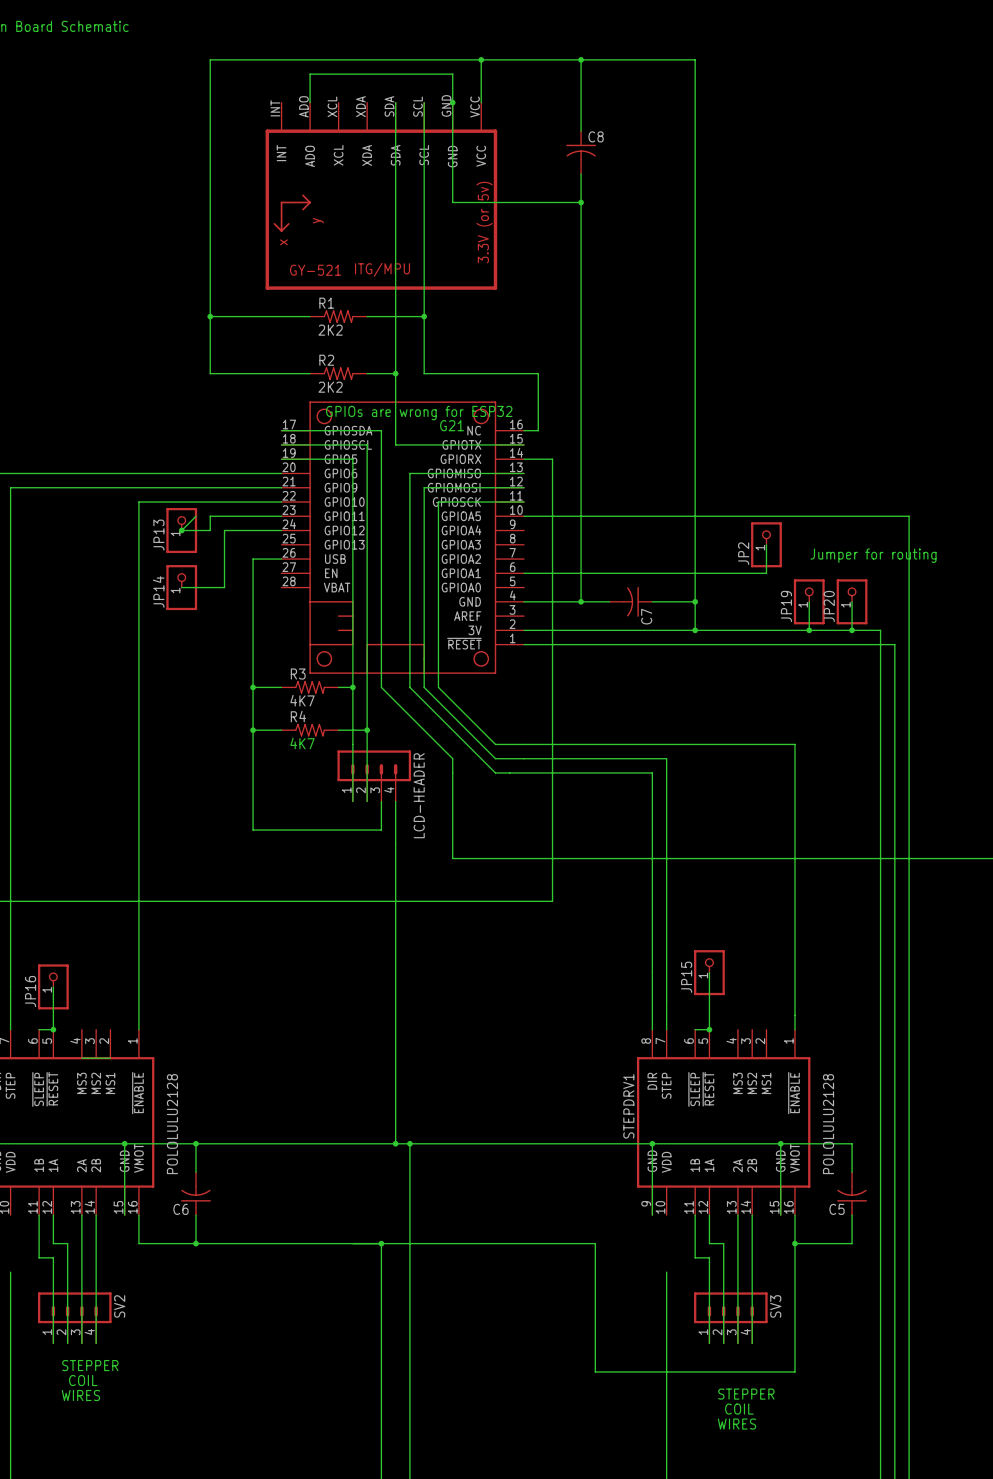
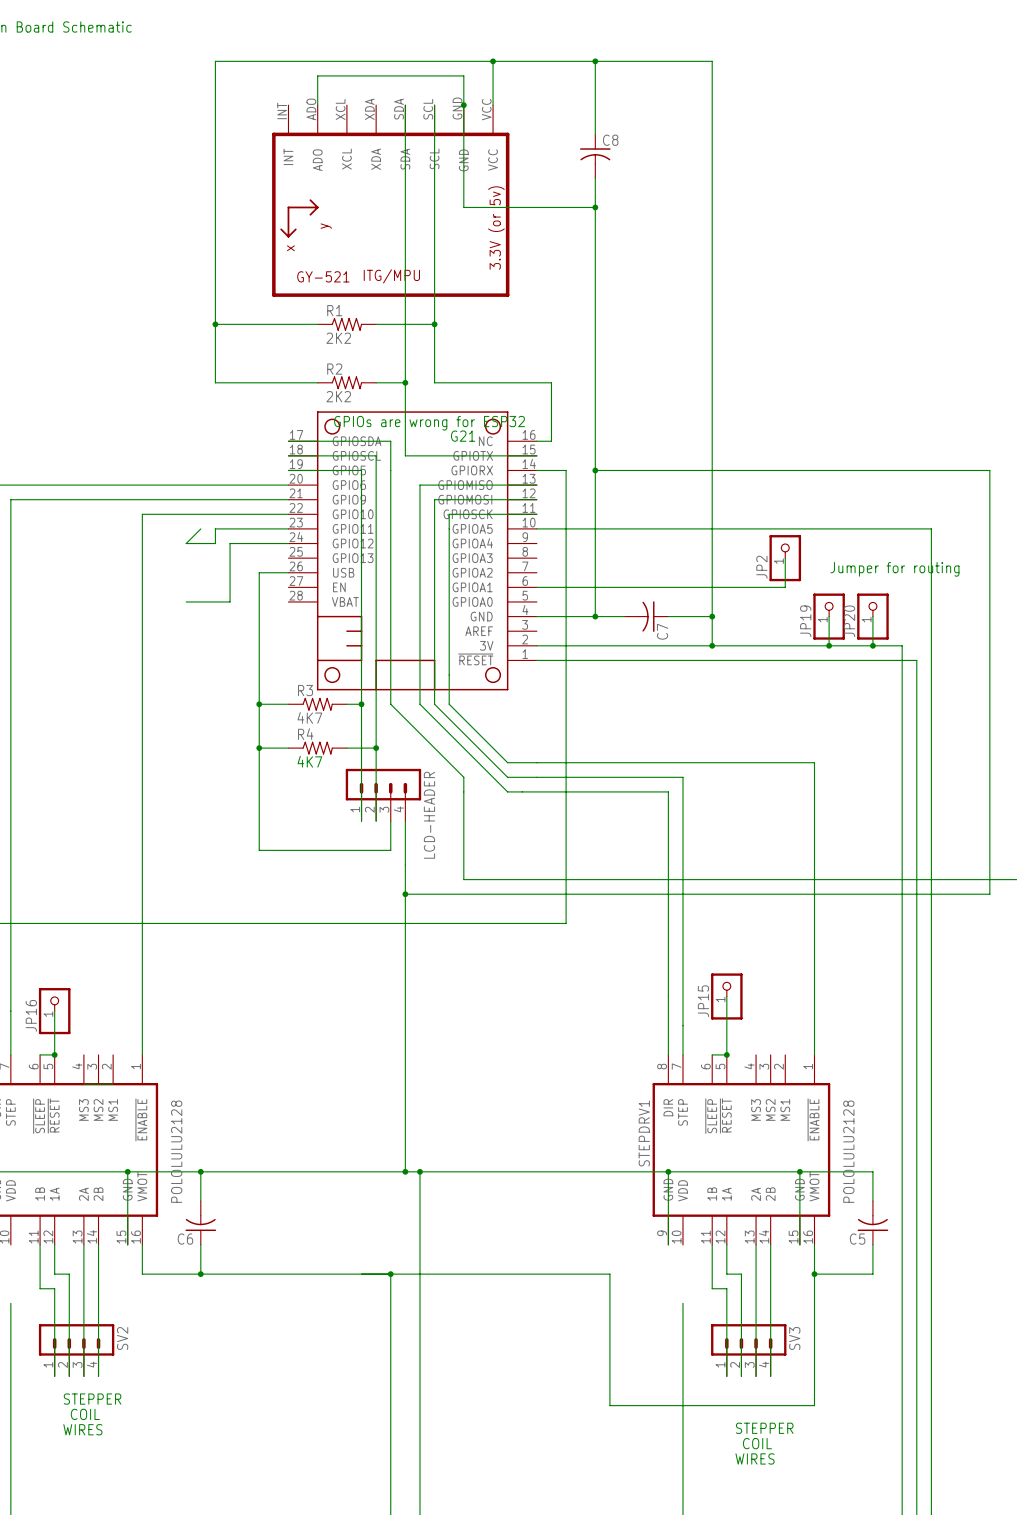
wire: none -> (595, 470) (989, 470) (989, 894) (405, 894)
junction: none -> (595, 470)
JP13: (181, 530) -> none
junction: (181, 530) -> none
JP14: (181, 587) -> none
junction: none -> (405, 894)

